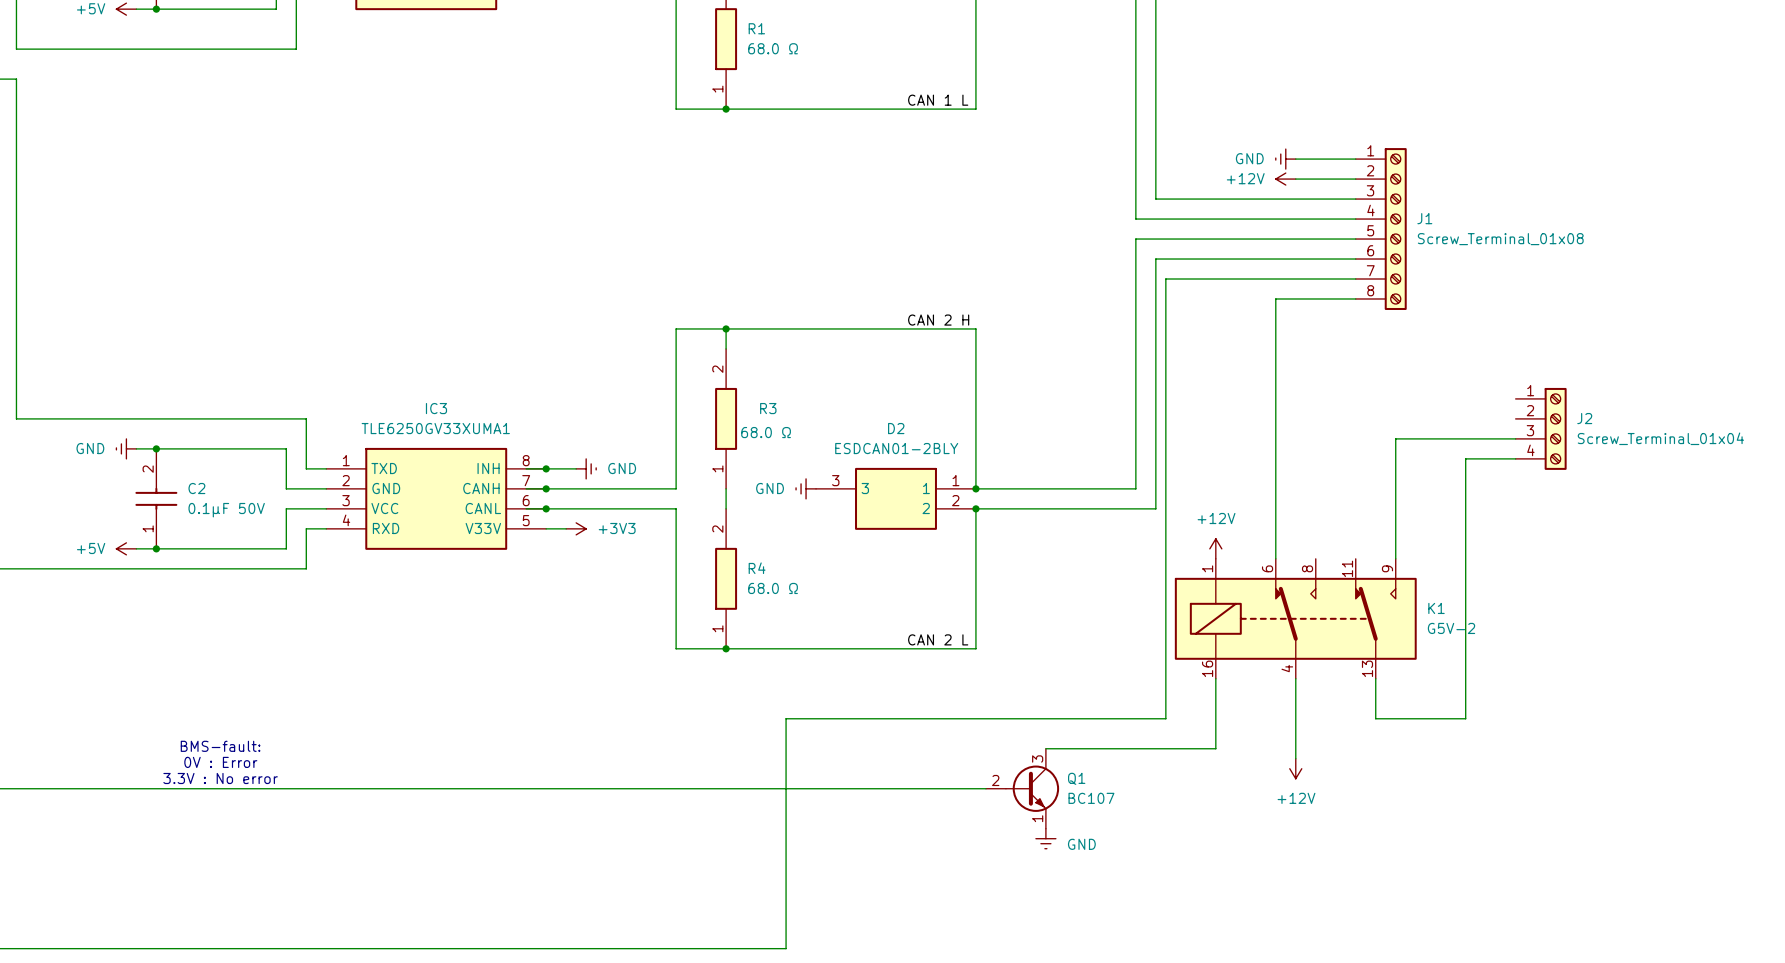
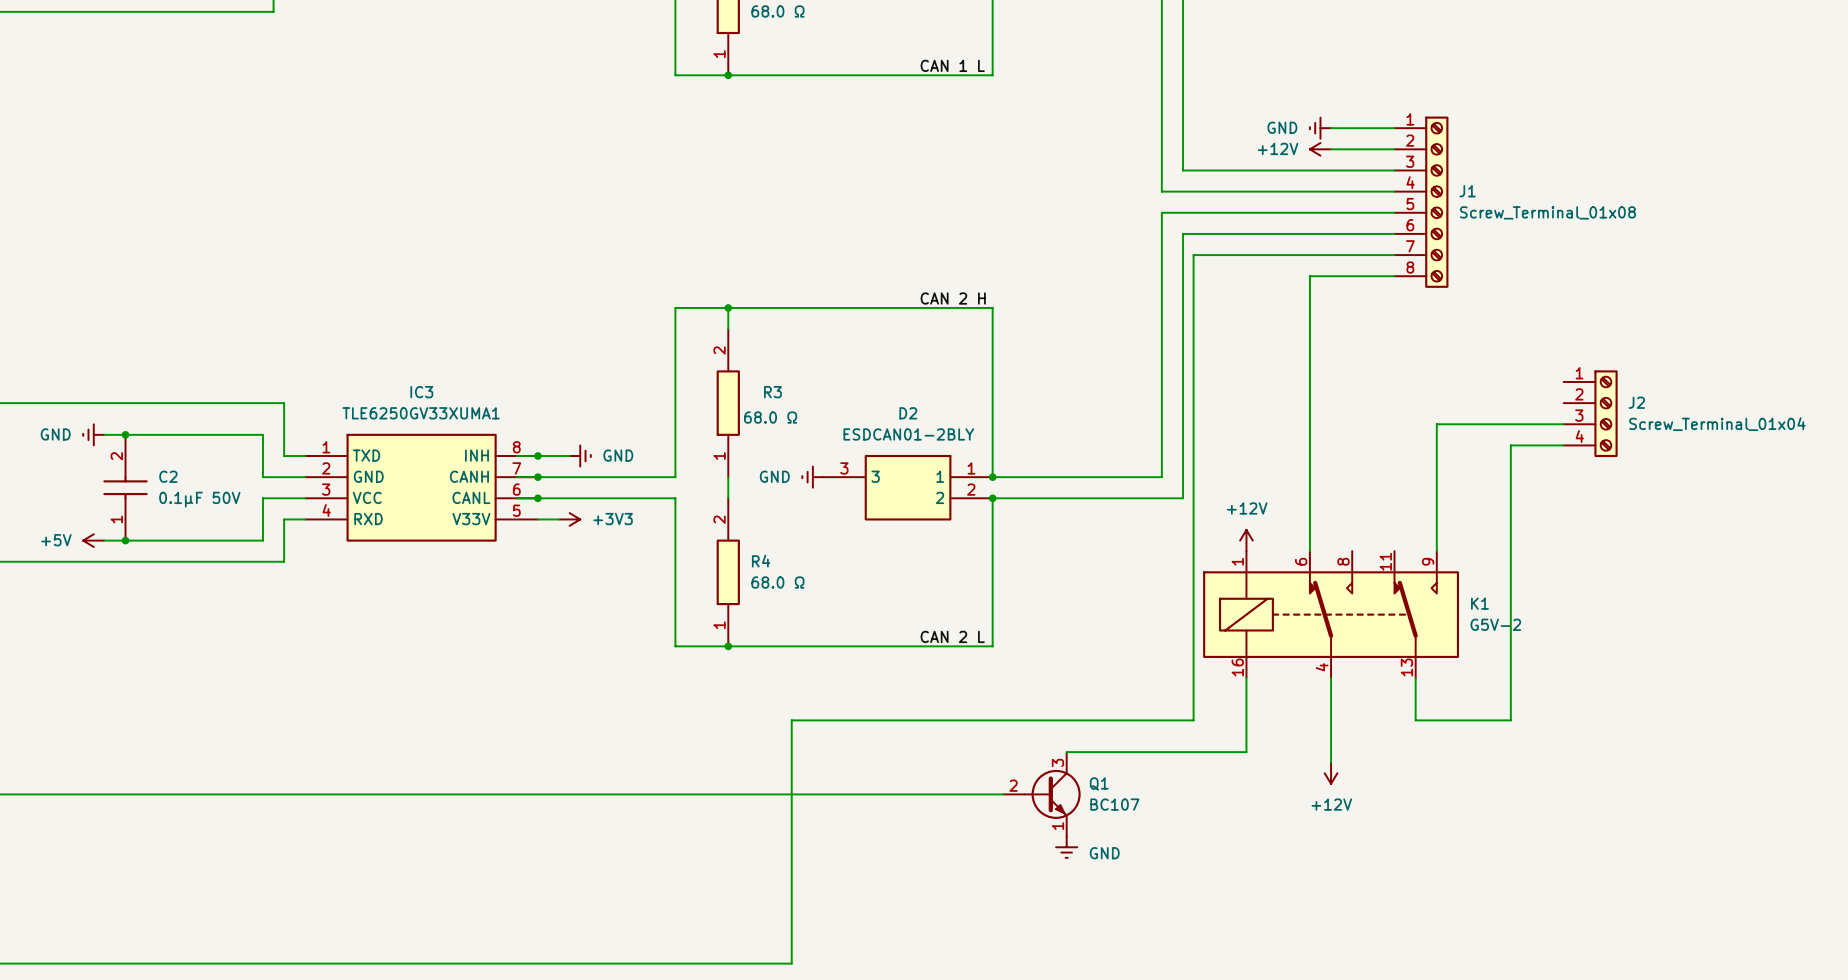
text: BMS-fault: (220, 746) -> none
text: 0V : Error (220, 762) -> none
text: 3.3V : No error (220, 778) -> none

